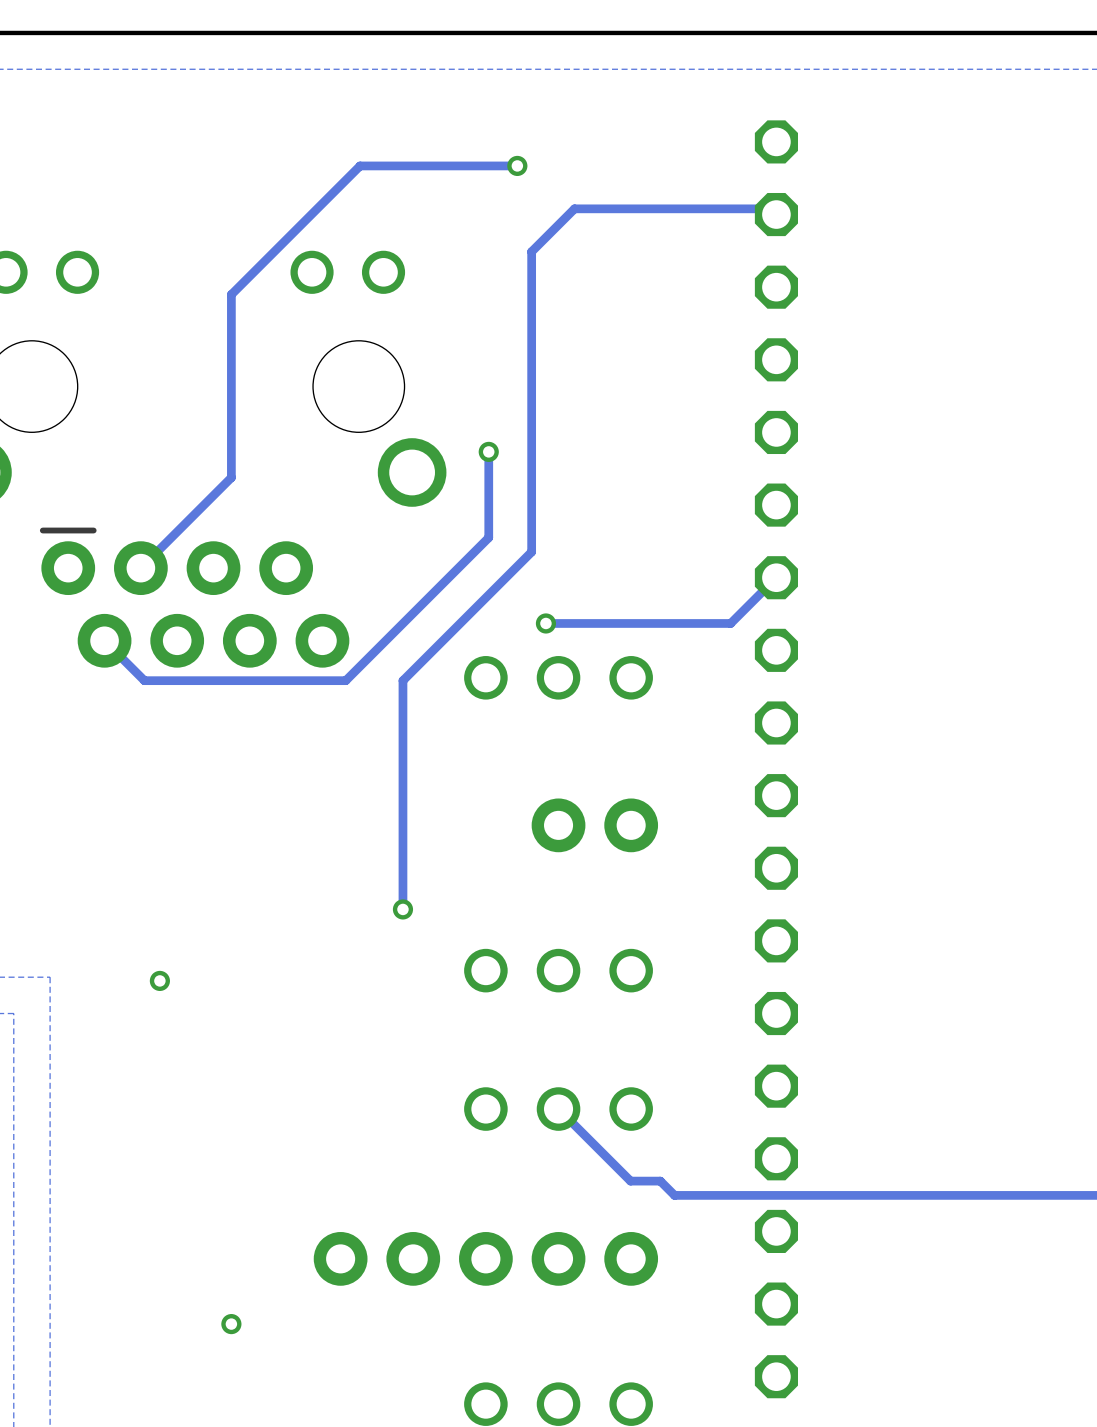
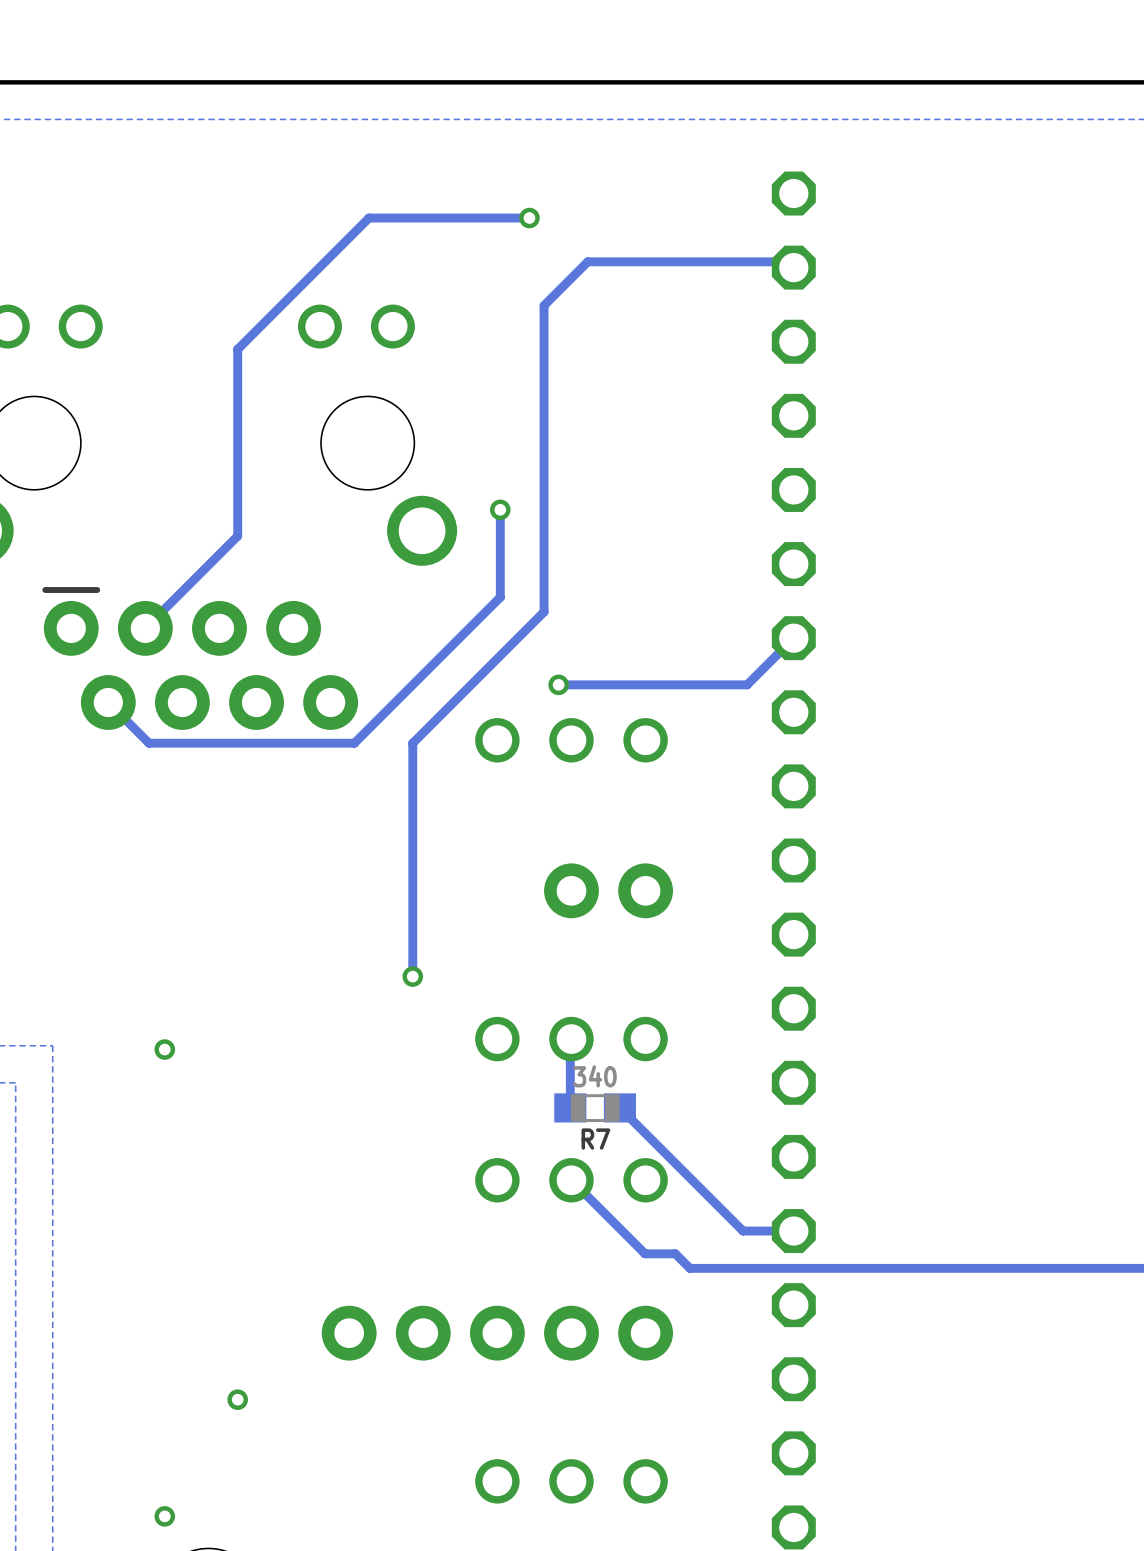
track: none -> (571, 1039) (570, 1107)
R7: none -> 340 (595, 1107)
track: none -> (619, 1107) (743, 1231) (793, 1231)

